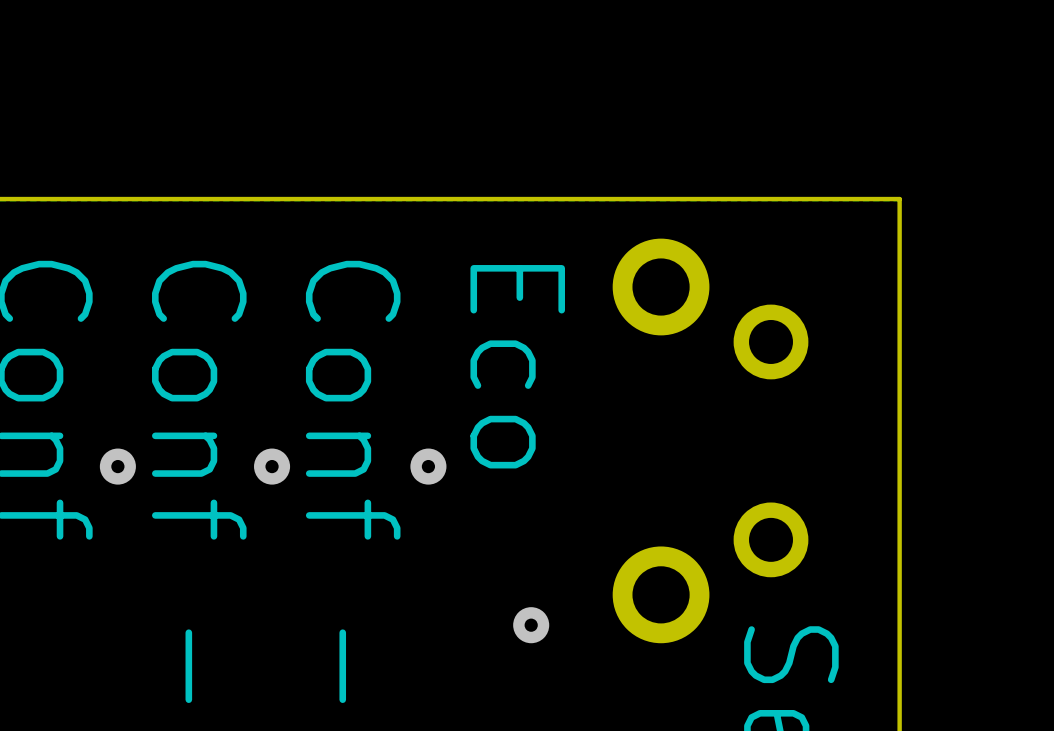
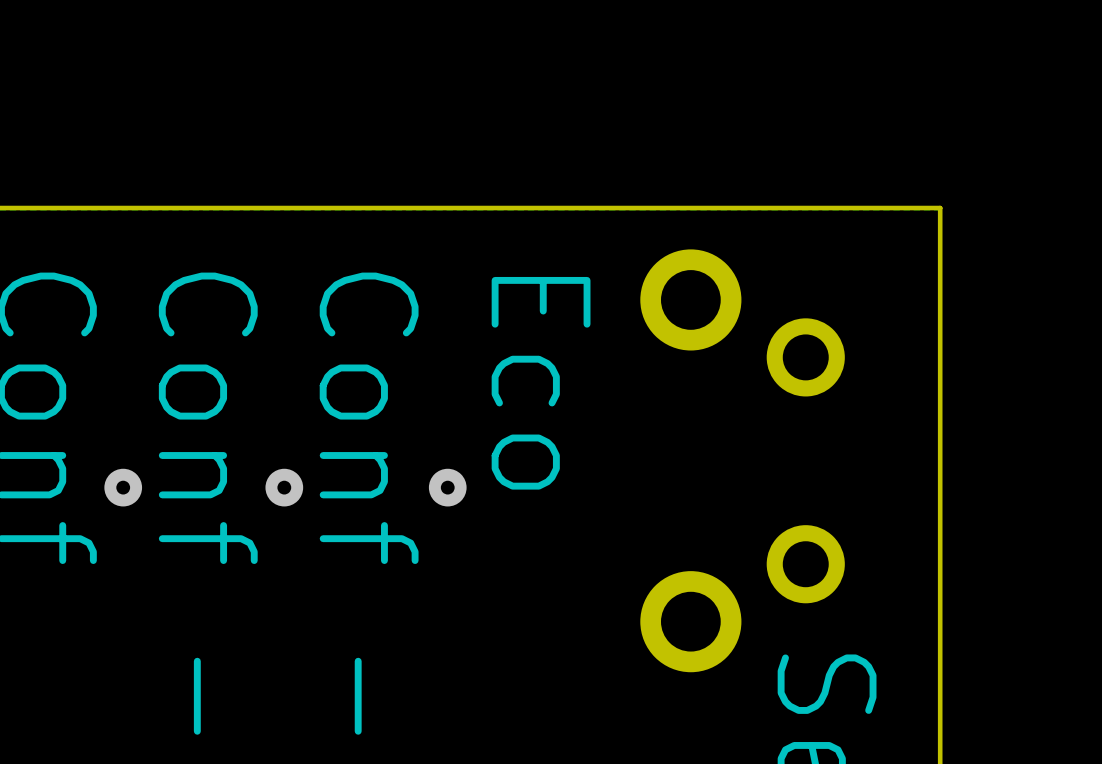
via: (531, 625) -> none

